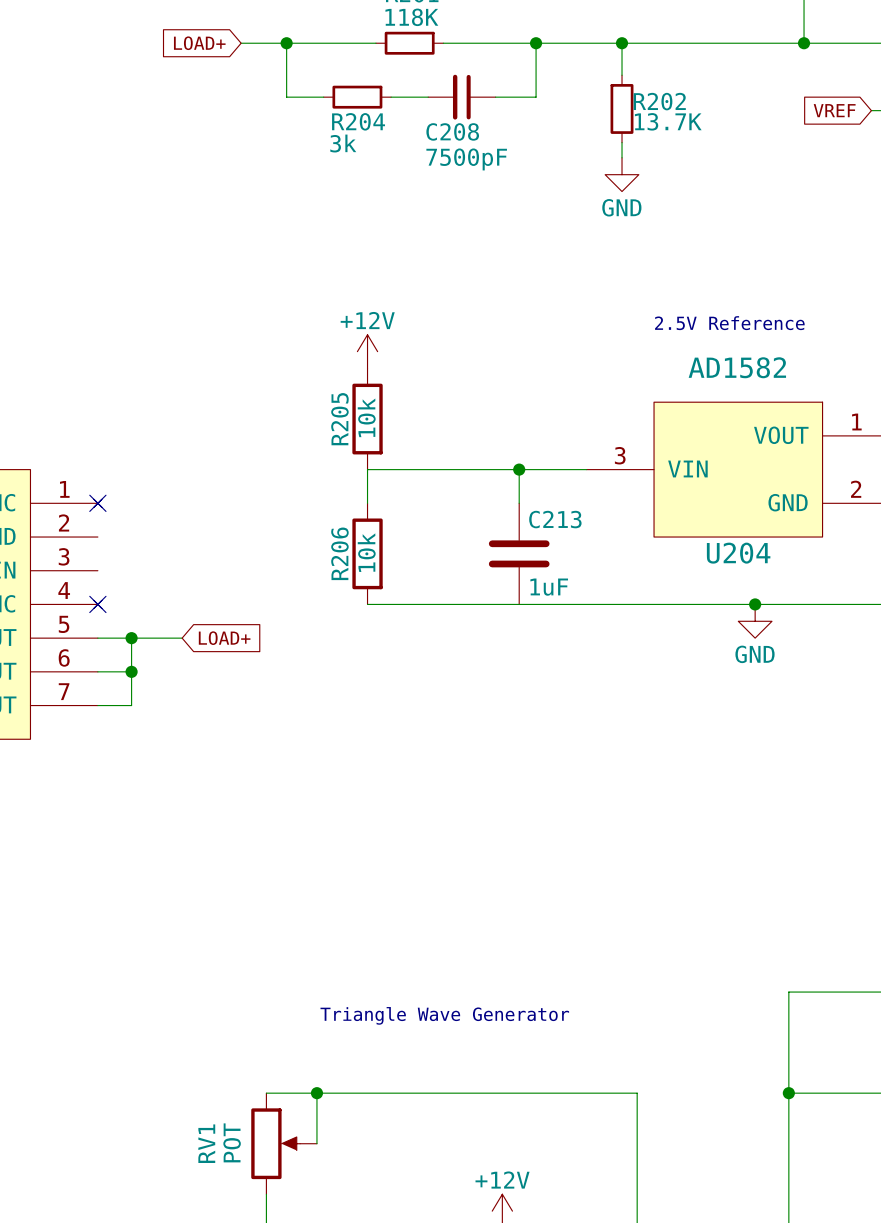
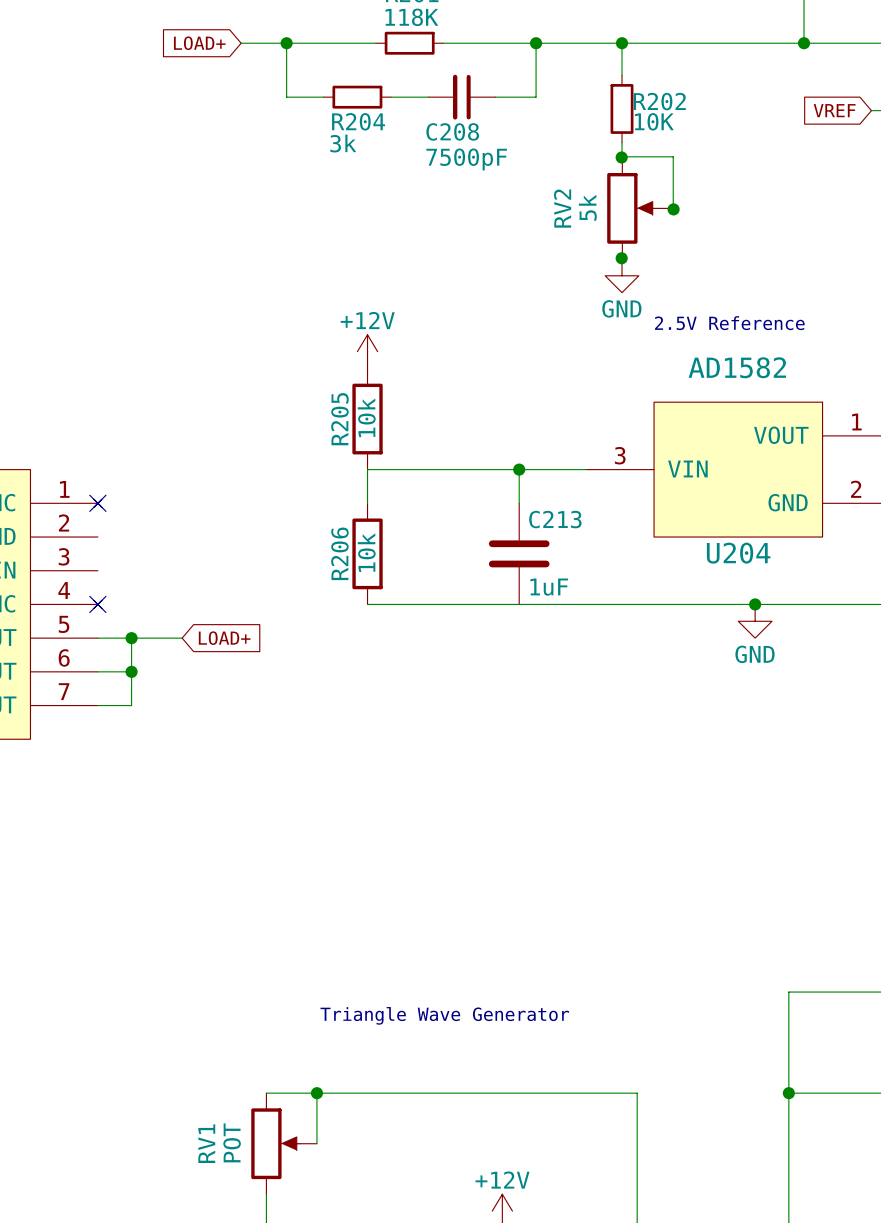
R202 value: 13.7K (668, 121) -> 10K (654, 121)
wire: none -> (622, 156) (673, 156) (673, 208)
junction: none -> (621, 157)
power symbol position: GND (622, 174) -> GND (622, 275)
RV2: none -> 5k (640, 208)
junction: none -> (673, 209)
junction: none -> (621, 258)

